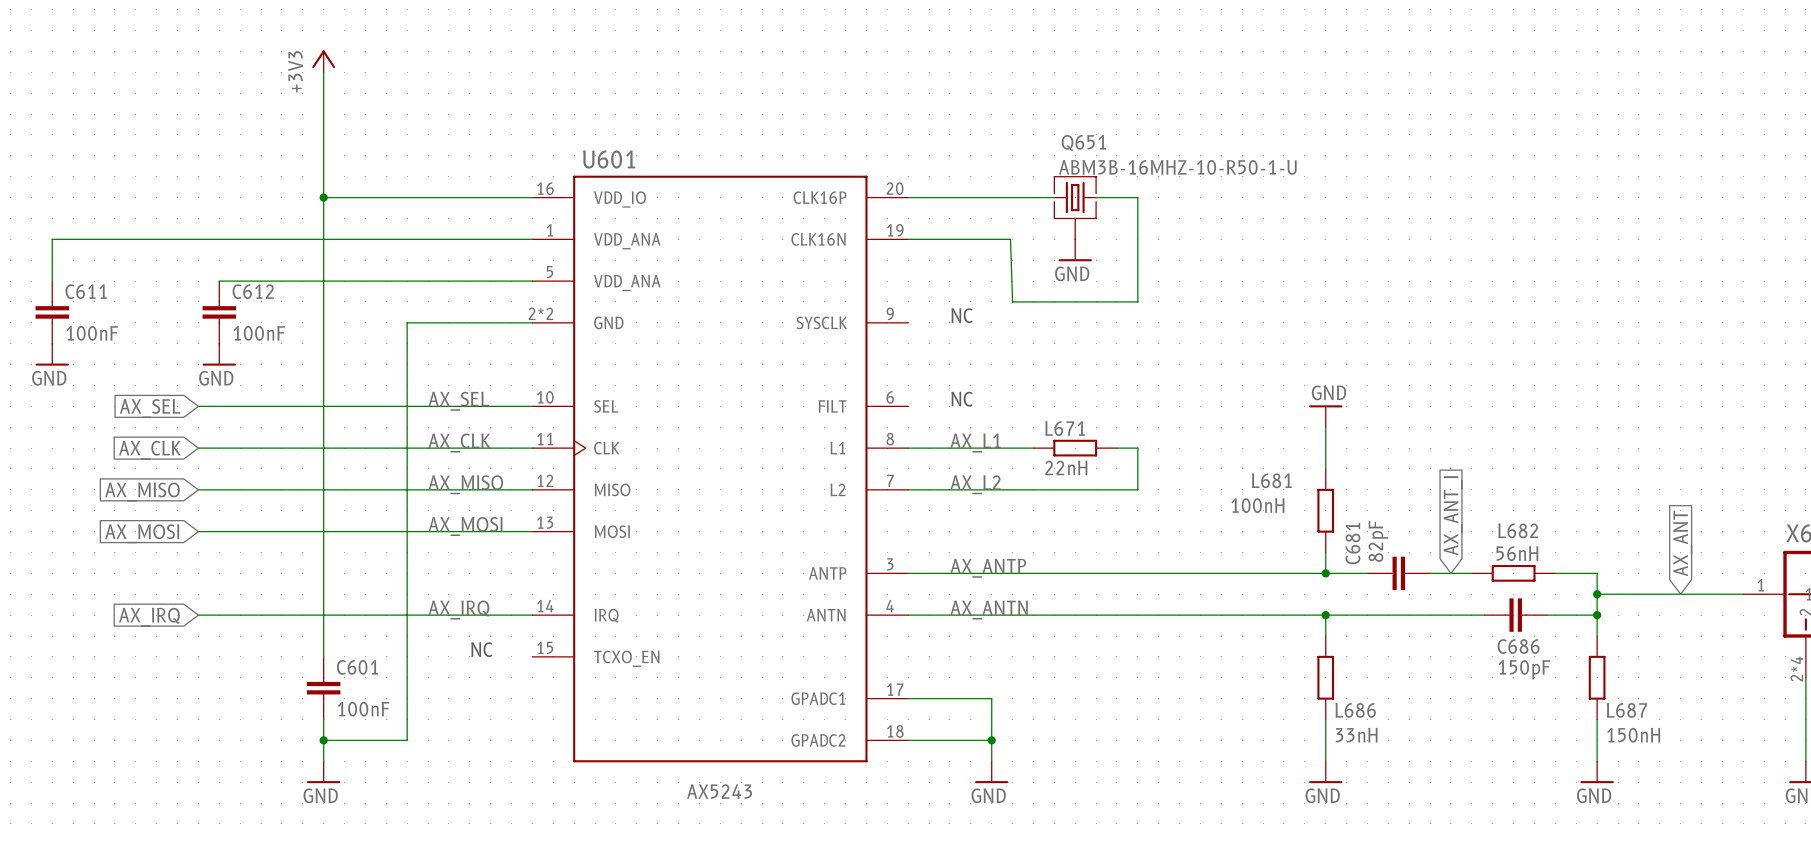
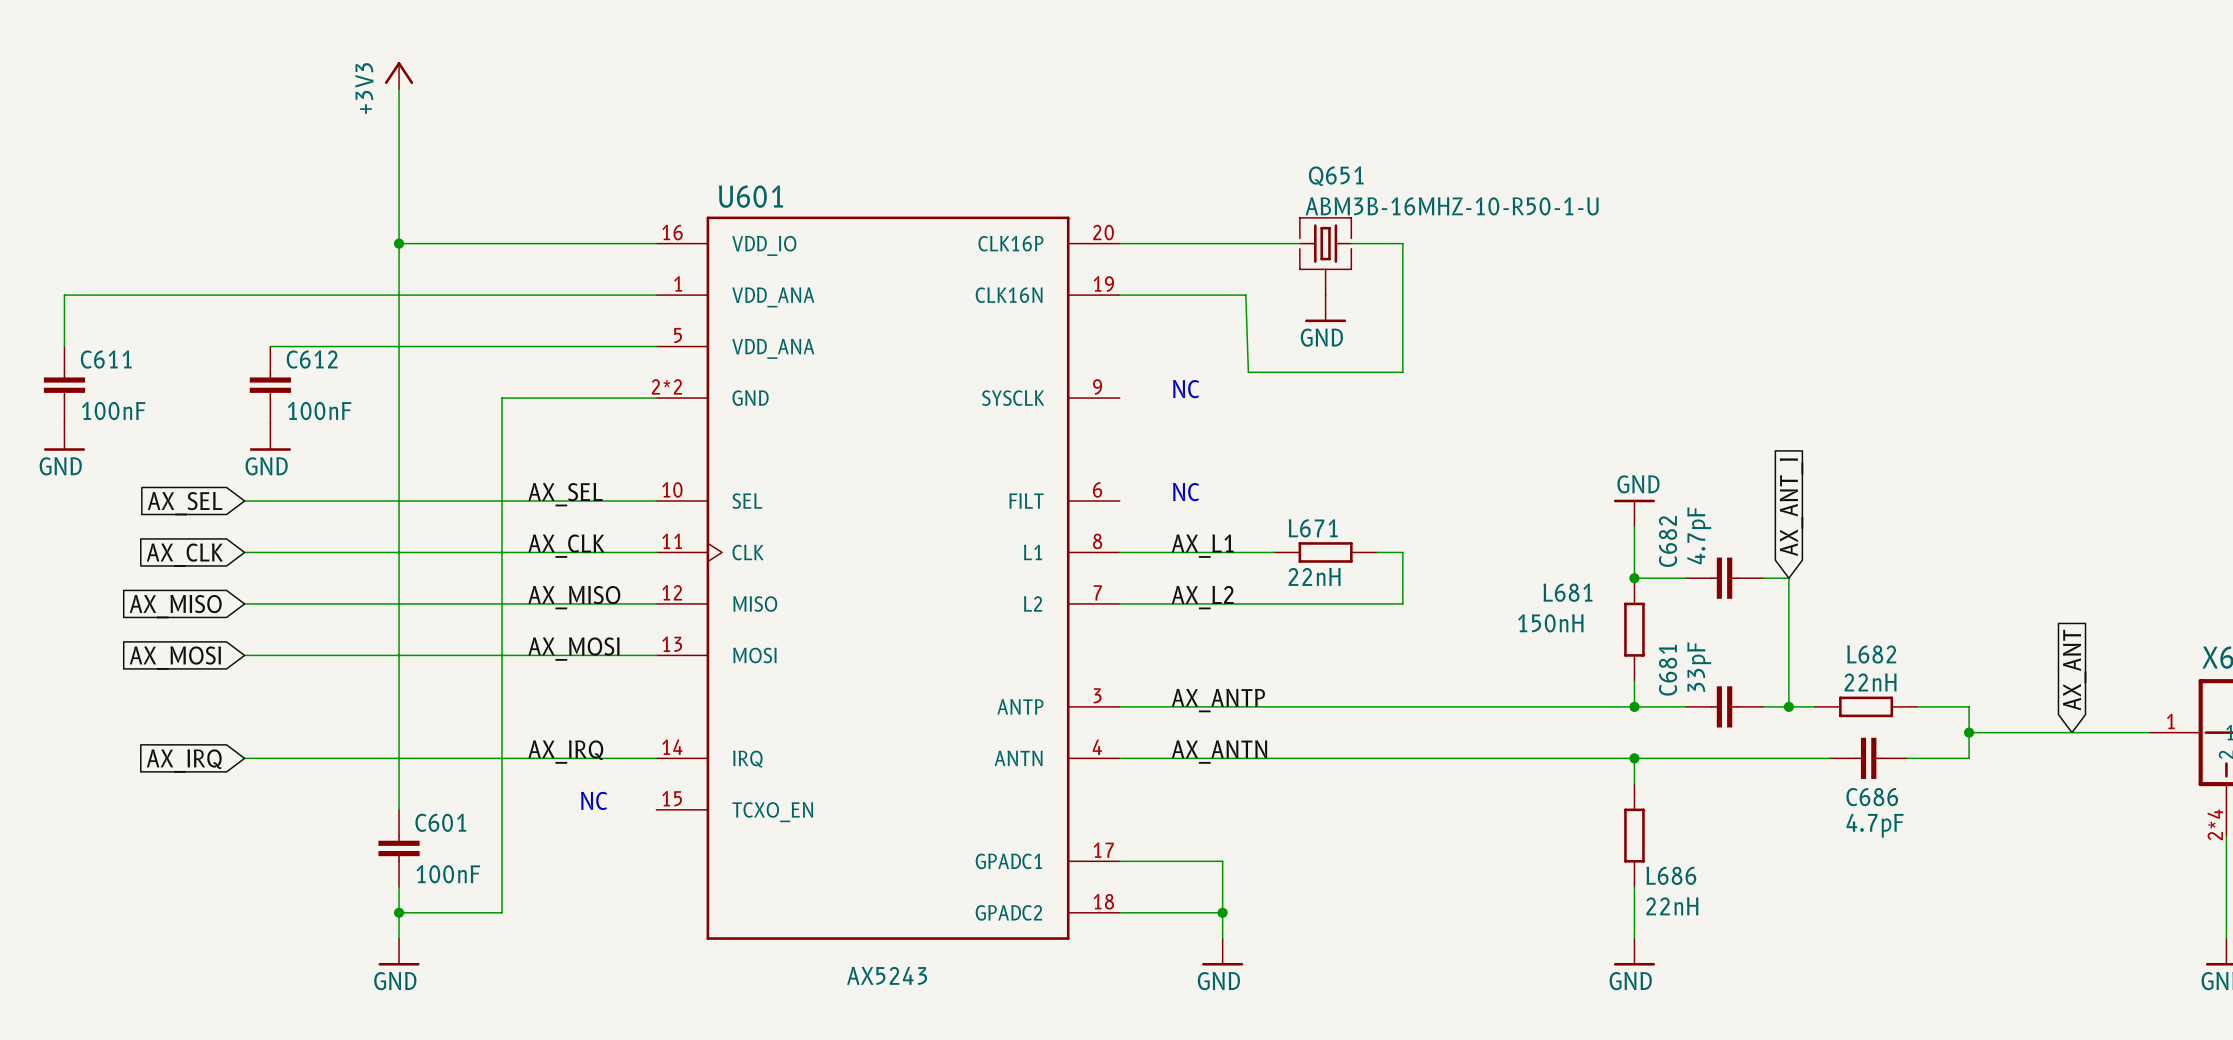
wire: none -> (1634, 578) (1685, 578)
junction: none -> (1634, 578)
C682: none -> 4.7pF (1724, 578)
wire: none -> (1763, 578) (1788, 578) (1788, 706)
L681 value: 100nH (1257, 505) -> 150nH (1550, 623)
global label position: AX_ANT_I (1453, 515) -> AX_ANT_I (1791, 507)
C681 value: 82pF (1378, 541) -> 33pF (1699, 667)
L682 value: 56nH (1517, 553) -> 22nH (1870, 682)
junction: none -> (1788, 706)
wire: (1597, 615) (1597, 636) -> none
junction: (1597, 615) -> none
C686 value: 150pF (1524, 669) -> 4.7pF (1875, 825)
L687: 150nH (1597, 677) -> none
wire: (1597, 719) (1597, 761) -> none
L686 value: 33nH (1356, 735) -> 22nH (1672, 906)
power symbol: GND (1597, 772) -> none

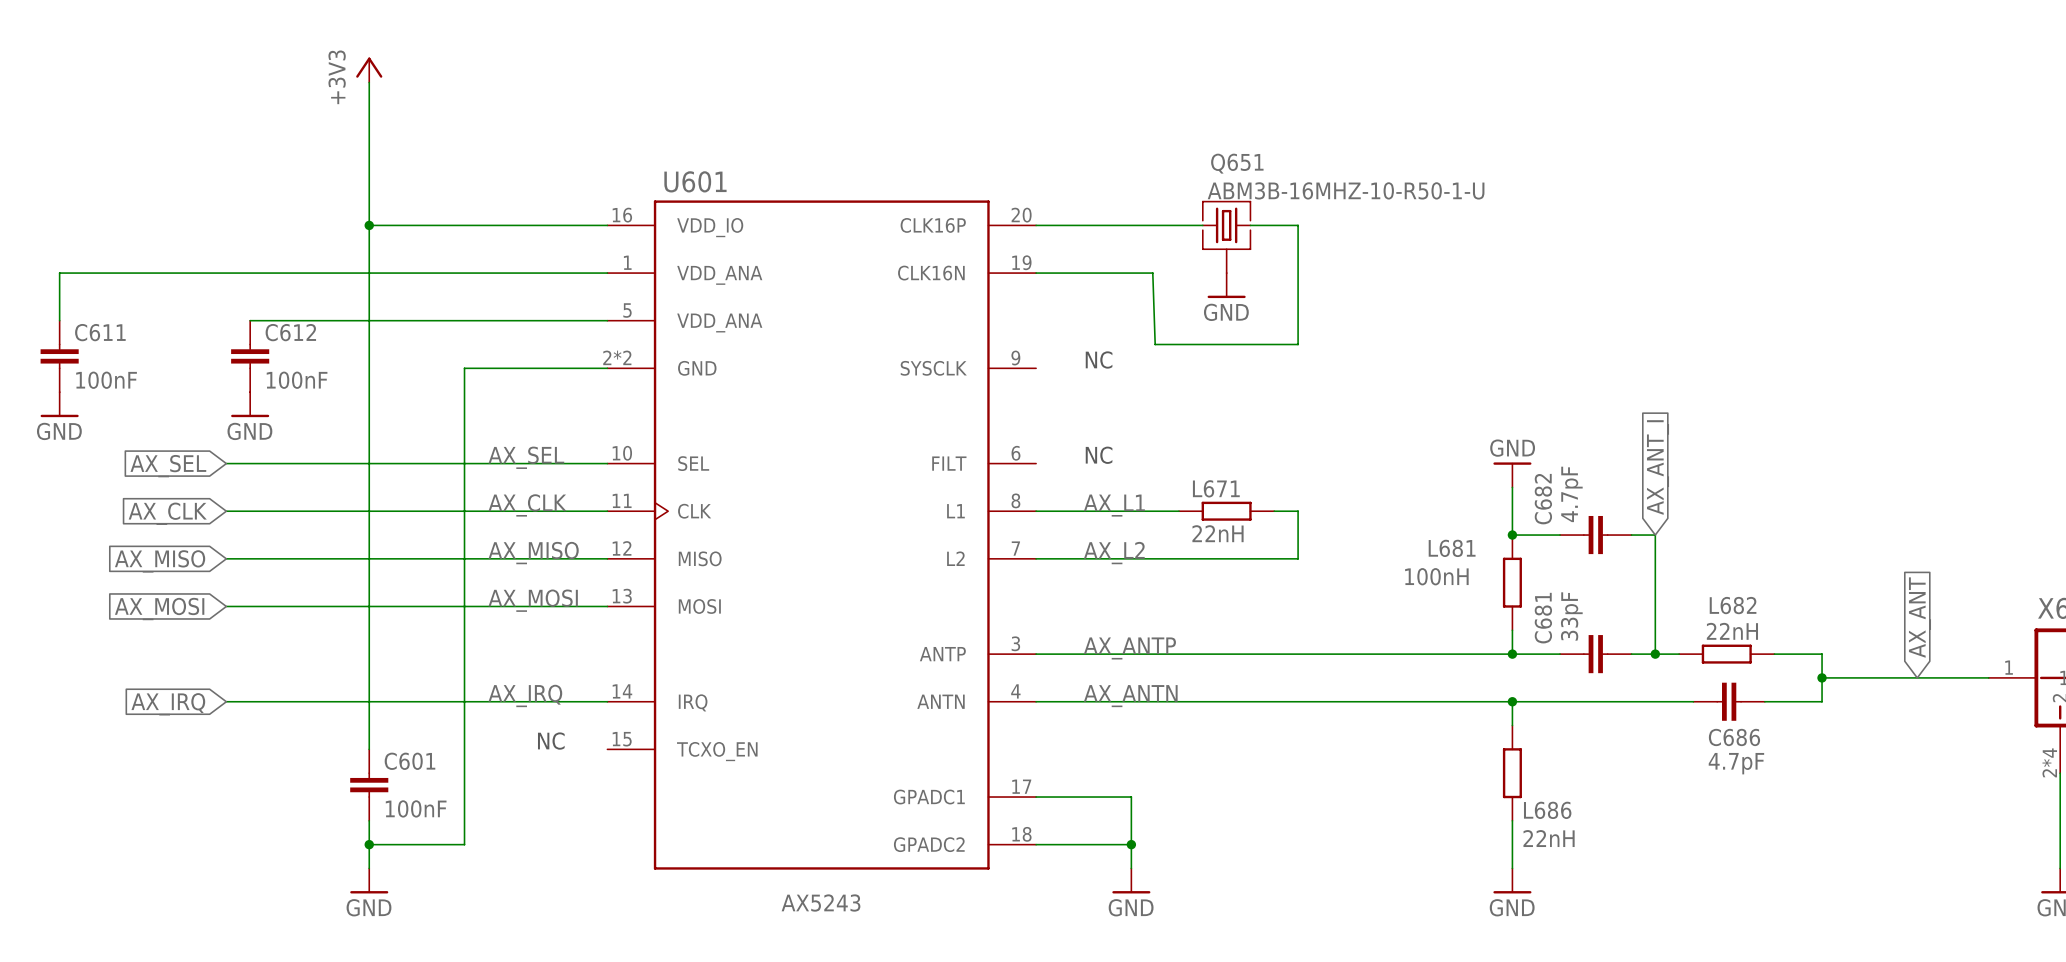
L681 value: 150nH (1550, 623) -> 100nH (1436, 576)

